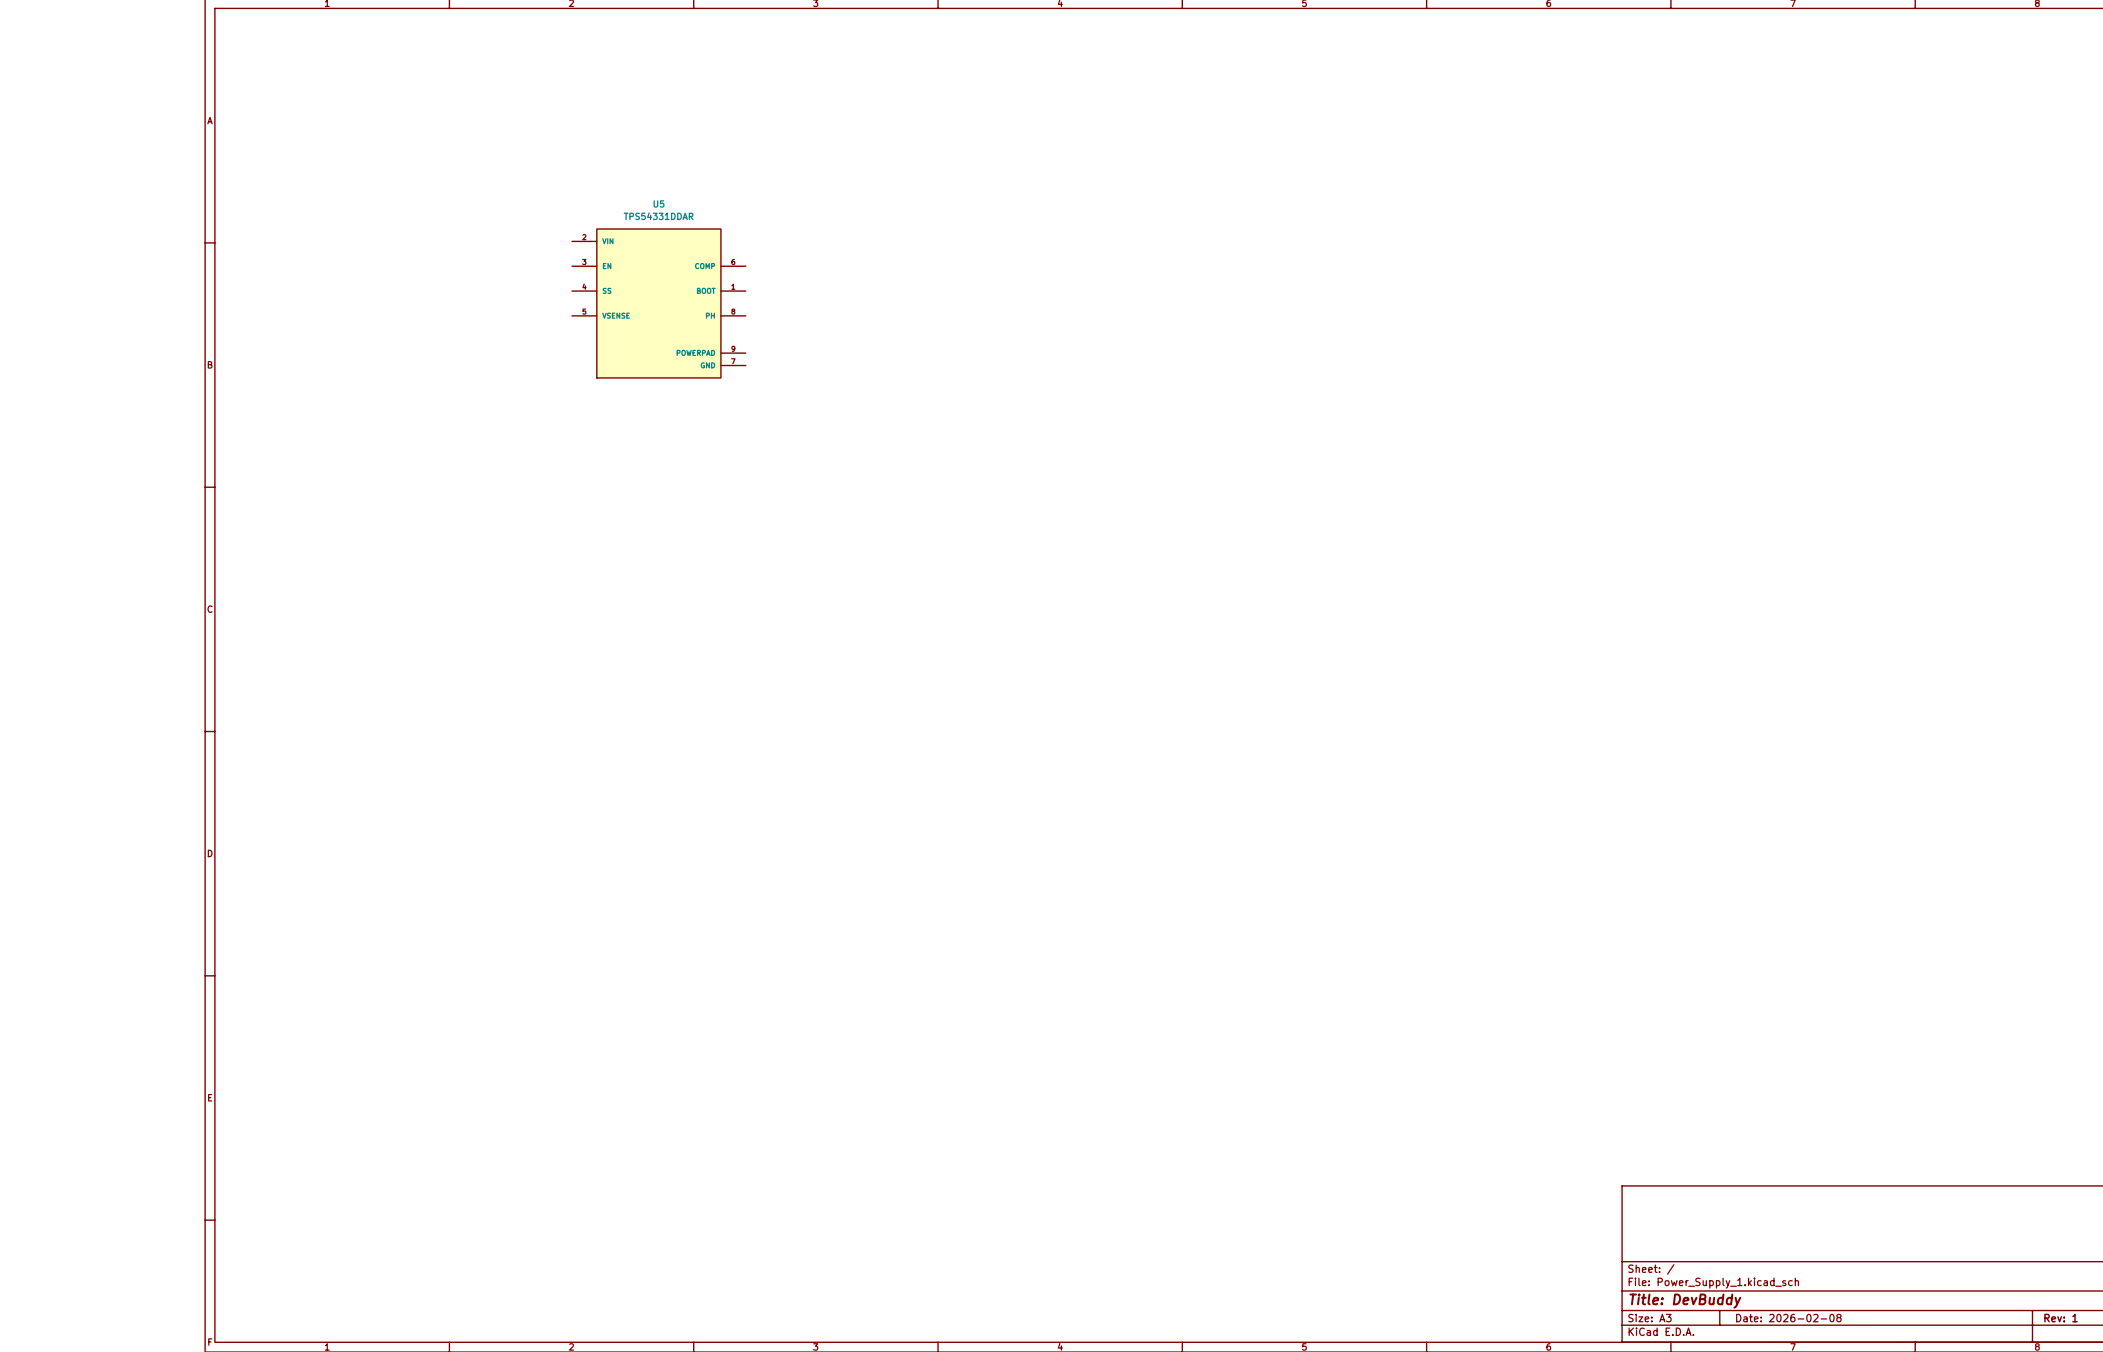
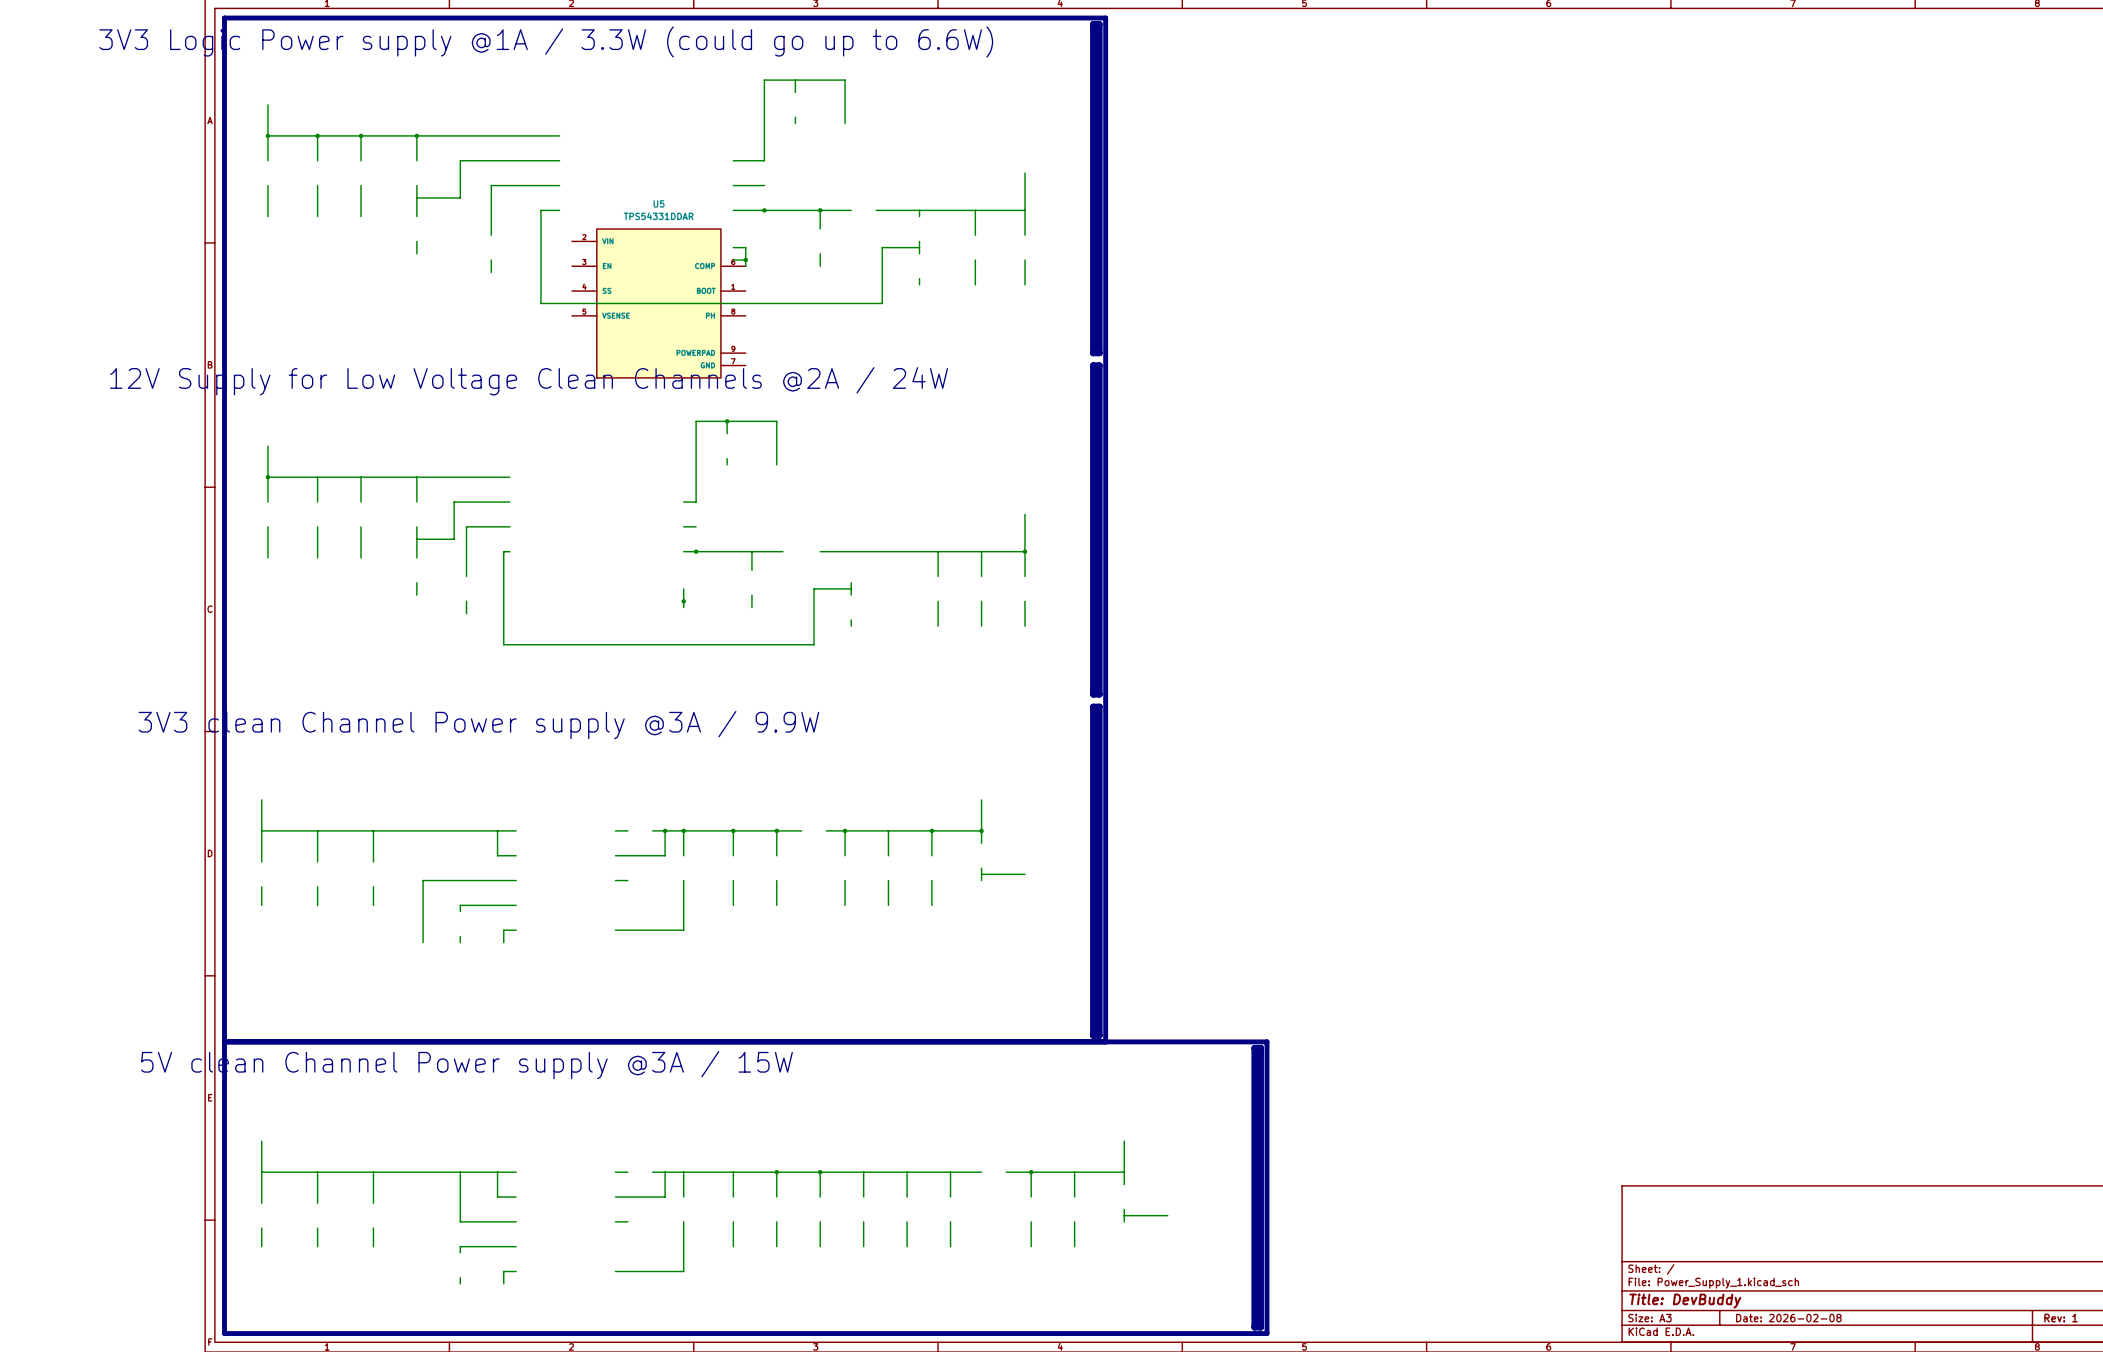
line: none -> (1093, 24) (1099, 24) (1099, 353) (1093, 353) (1093, 24)
text: none -> 3V3 Logic Power supply @1A / 3.3W (could go up to 6.6W) (546, 41)
wire: none -> (795, 80) (795, 92)
wire: none -> (267, 104) (267, 160)
wire: none -> (795, 117) (795, 123)
wire: none -> (845, 123) (845, 80) (764, 80) (764, 160) (733, 160)
wire: none -> (267, 135) (559, 135)
junction: none -> (267, 135)
wire: none -> (317, 135) (317, 160)
junction: none -> (317, 135)
wire: none -> (361, 135) (361, 160)
junction: none -> (361, 135)
wire: none -> (416, 135) (416, 160)
junction: none -> (416, 135)
wire: none -> (559, 160) (460, 160) (460, 197) (416, 197)
wire: none -> (1024, 173) (1024, 235)
wire: none -> (267, 185) (267, 216)
wire: none -> (317, 185) (317, 216)
wire: none -> (361, 185) (361, 216)
wire: none -> (416, 185) (416, 216)
wire: none -> (559, 185) (491, 185) (491, 235)
wire: none -> (733, 185) (764, 185)
wire: none -> (559, 210) (540, 210) (540, 303) (882, 303) (882, 247) (919, 247)
wire: none -> (733, 210) (851, 210)
junction: none -> (764, 210)
wire: none -> (820, 210) (820, 229)
junction: none -> (820, 210)
wire: none -> (876, 210) (1024, 210)
wire: none -> (919, 210) (919, 216)
wire: none -> (975, 210) (975, 235)
wire: none -> (416, 241) (416, 253)
wire: none -> (919, 241) (919, 253)
wire: none -> (733, 247) (745, 247) (745, 266)
wire: none -> (820, 253) (820, 266)
wire: none -> (491, 260) (491, 272)
wire: none -> (733, 260) (745, 260)
junction: none -> (745, 260)
wire: none -> (975, 260) (975, 284)
wire: none -> (1024, 260) (1024, 284)
wire: none -> (919, 278) (919, 284)
line: none -> (1093, 365) (1093, 694) (1099, 694) (1099, 365) (1093, 365)
text: none -> 12V Supply for Low Voltage Clean Channels @2A / 24W (529, 381)
wire: none -> (727, 421) (727, 433)
junction: none -> (727, 421)
wire: none -> (267, 446) (267, 502)
wire: none -> (727, 458) (727, 464)
wire: none -> (776, 464) (776, 421) (696, 421) (696, 502) (683, 502)
wire: none -> (267, 477) (509, 477)
junction: none -> (267, 477)
wire: none -> (317, 477) (317, 502)
wire: none -> (361, 477) (361, 502)
wire: none -> (416, 477) (416, 502)
wire: none -> (509, 502) (454, 502) (454, 539) (416, 539)
wire: none -> (1024, 514) (1024, 576)
wire: none -> (267, 526) (267, 557)
wire: none -> (317, 526) (317, 557)
wire: none -> (361, 526) (361, 557)
wire: none -> (416, 526) (416, 557)
wire: none -> (509, 526) (466, 526) (466, 576)
wire: none -> (683, 526) (696, 526)
wire: none -> (509, 551) (503, 551) (503, 644) (814, 644) (814, 588) (851, 588)
wire: none -> (683, 551) (782, 551)
junction: none -> (696, 551)
wire: none -> (751, 551) (751, 570)
wire: none -> (820, 551) (1024, 551)
wire: none -> (938, 551) (938, 576)
wire: none -> (981, 551) (981, 576)
junction: none -> (1024, 551)
wire: none -> (416, 582) (416, 595)
wire: none -> (851, 582) (851, 595)
wire: none -> (683, 588) (683, 607)
wire: none -> (751, 595) (751, 607)
wire: none -> (466, 601) (466, 613)
junction: none -> (683, 601)
wire: none -> (938, 601) (938, 626)
wire: none -> (981, 601) (981, 626)
wire: none -> (1024, 601) (1024, 626)
wire: none -> (851, 619) (851, 626)
line: none -> (1093, 706) (1093, 1035) (1099, 1035) (1099, 706) (1093, 706)
text: none -> 3V3 clean Channel Power supply @3A / 9.9W (478, 725)
wire: none -> (261, 799) (261, 861)
wire: none -> (981, 799) (981, 843)
wire: none -> (261, 830) (516, 830)
wire: none -> (317, 830) (317, 861)
wire: none -> (373, 830) (373, 861)
wire: none -> (497, 830) (497, 855) (516, 855)
wire: none -> (615, 830) (627, 830)
wire: none -> (652, 830) (801, 830)
wire: none -> (665, 830) (665, 855) (615, 855)
junction: none -> (665, 830)
wire: none -> (683, 830) (683, 855)
junction: none -> (683, 830)
wire: none -> (733, 830) (733, 855)
junction: none -> (733, 830)
wire: none -> (776, 830) (776, 855)
junction: none -> (776, 830)
wire: none -> (826, 830) (981, 830)
wire: none -> (845, 830) (845, 855)
junction: none -> (845, 830)
wire: none -> (888, 830) (888, 855)
wire: none -> (931, 830) (931, 855)
junction: none -> (931, 830)
junction: none -> (981, 830)
wire: none -> (981, 868) (981, 880)
wire: none -> (981, 874) (1024, 874)
wire: none -> (516, 880) (423, 880) (423, 942)
wire: none -> (615, 880) (627, 880)
wire: none -> (683, 880) (683, 930) (615, 930)
wire: none -> (733, 880) (733, 905)
wire: none -> (776, 880) (776, 905)
wire: none -> (845, 880) (845, 905)
wire: none -> (888, 880) (888, 905)
wire: none -> (931, 880) (931, 905)
wire: none -> (261, 886) (261, 905)
wire: none -> (317, 886) (317, 905)
wire: none -> (373, 886) (373, 905)
wire: none -> (516, 905) (460, 905) (460, 911)
wire: none -> (516, 930) (503, 930) (503, 942)
wire: none -> (460, 936) (460, 942)
line: none -> (224, 1041) (1266, 1041) (1266, 1333) (224, 1333) (224, 18) (1105, 18) (1105, 1041)
line: none -> (1254, 1048) (1260, 1048) (1260, 1327) (1254, 1327) (1254, 1048)
text: none -> 5V clean Channel Power supply @3A / 15W (466, 1065)
wire: none -> (261, 1141) (261, 1203)
wire: none -> (1124, 1141) (1124, 1184)
wire: none -> (261, 1172) (516, 1172)
wire: none -> (317, 1172) (317, 1203)
wire: none -> (373, 1172) (373, 1203)
wire: none -> (460, 1172) (460, 1221) (516, 1221)
wire: none -> (497, 1172) (497, 1197) (516, 1197)
wire: none -> (615, 1172) (627, 1172)
wire: none -> (652, 1172) (981, 1172)
wire: none -> (665, 1172) (665, 1197) (615, 1197)
wire: none -> (683, 1172) (683, 1197)
wire: none -> (733, 1172) (733, 1197)
wire: none -> (776, 1172) (776, 1197)
junction: none -> (776, 1172)
wire: none -> (820, 1172) (820, 1197)
junction: none -> (820, 1172)
wire: none -> (863, 1172) (863, 1197)
wire: none -> (907, 1172) (907, 1197)
wire: none -> (950, 1172) (950, 1197)
wire: none -> (1006, 1172) (1124, 1172)
wire: none -> (1031, 1172) (1031, 1197)
junction: none -> (1031, 1172)
wire: none -> (1074, 1172) (1074, 1197)
wire: none -> (1124, 1209) (1124, 1221)
wire: none -> (1124, 1215) (1167, 1215)
wire: none -> (615, 1221) (627, 1221)
wire: none -> (683, 1221) (683, 1271) (615, 1271)
wire: none -> (733, 1221) (733, 1246)
wire: none -> (776, 1221) (776, 1246)
wire: none -> (820, 1221) (820, 1246)
wire: none -> (863, 1221) (863, 1246)
wire: none -> (907, 1221) (907, 1246)
wire: none -> (950, 1221) (950, 1246)
wire: none -> (1031, 1221) (1031, 1246)
wire: none -> (1074, 1221) (1074, 1246)
wire: none -> (261, 1228) (261, 1246)
wire: none -> (317, 1228) (317, 1246)
wire: none -> (373, 1228) (373, 1246)
wire: none -> (516, 1246) (460, 1246) (460, 1252)
wire: none -> (516, 1271) (503, 1271) (503, 1283)
wire: none -> (460, 1277) (460, 1283)

